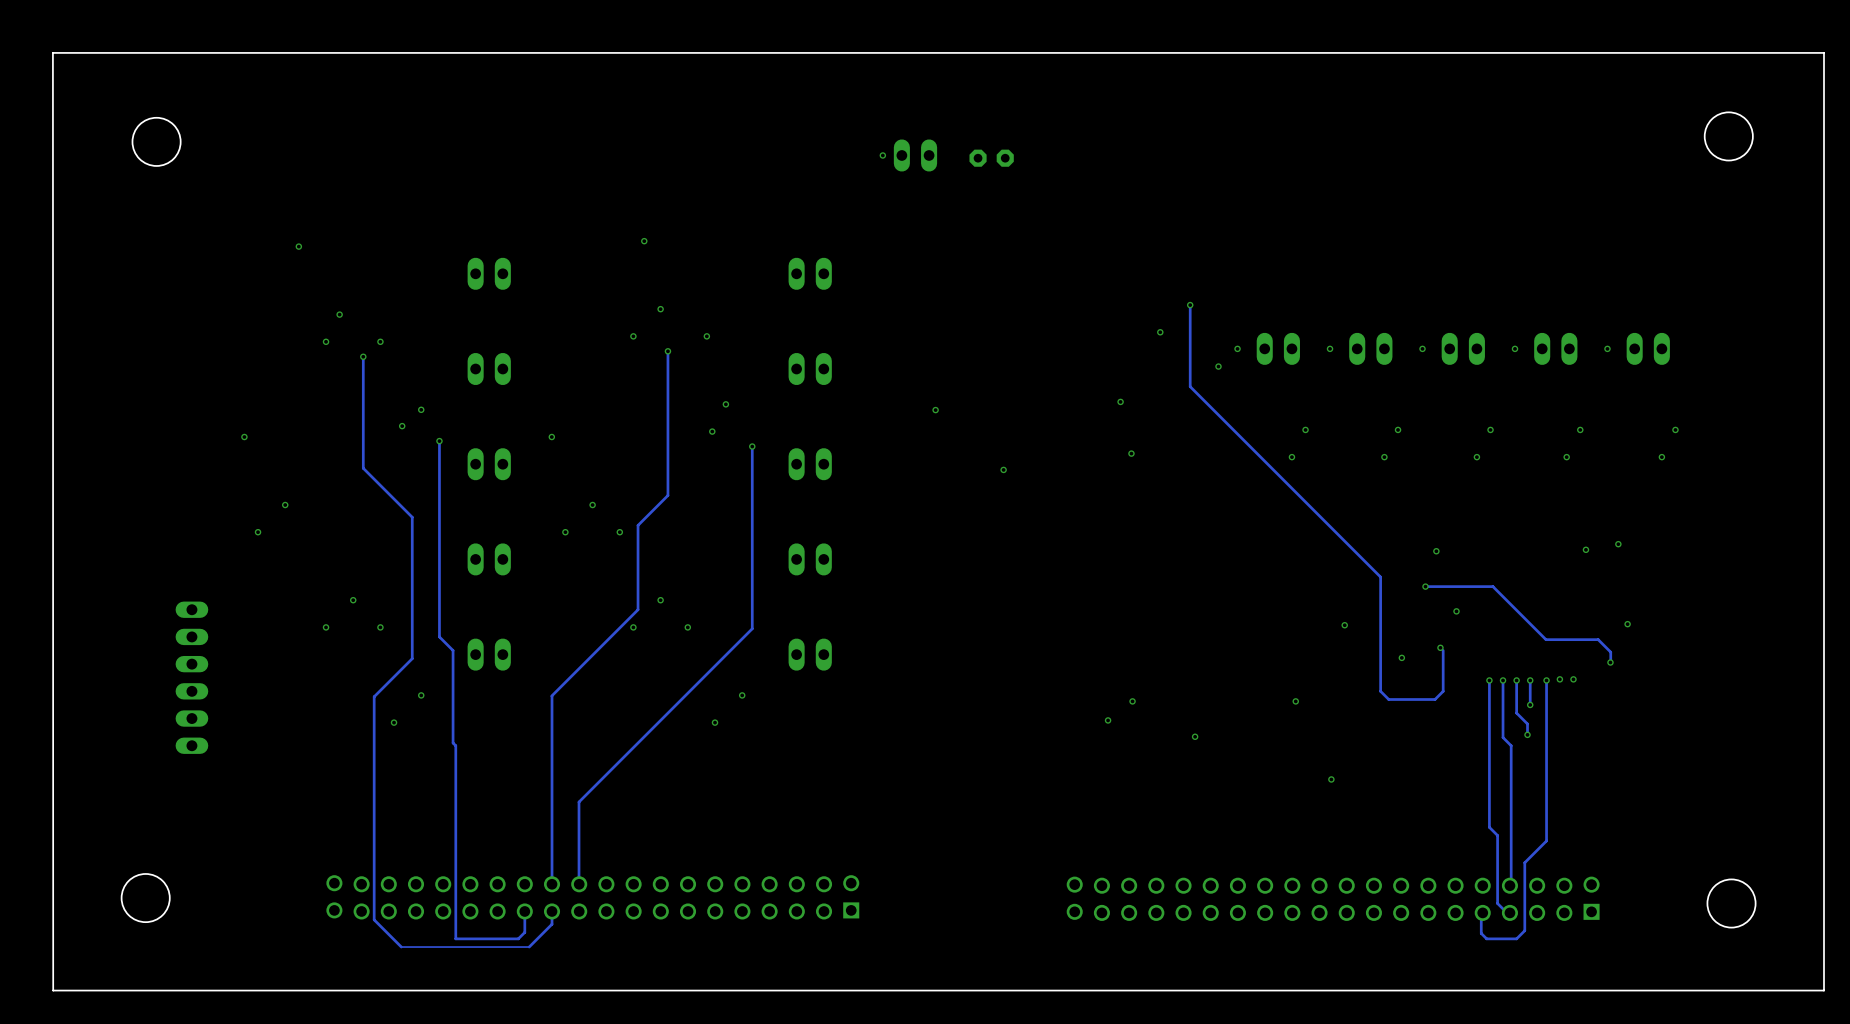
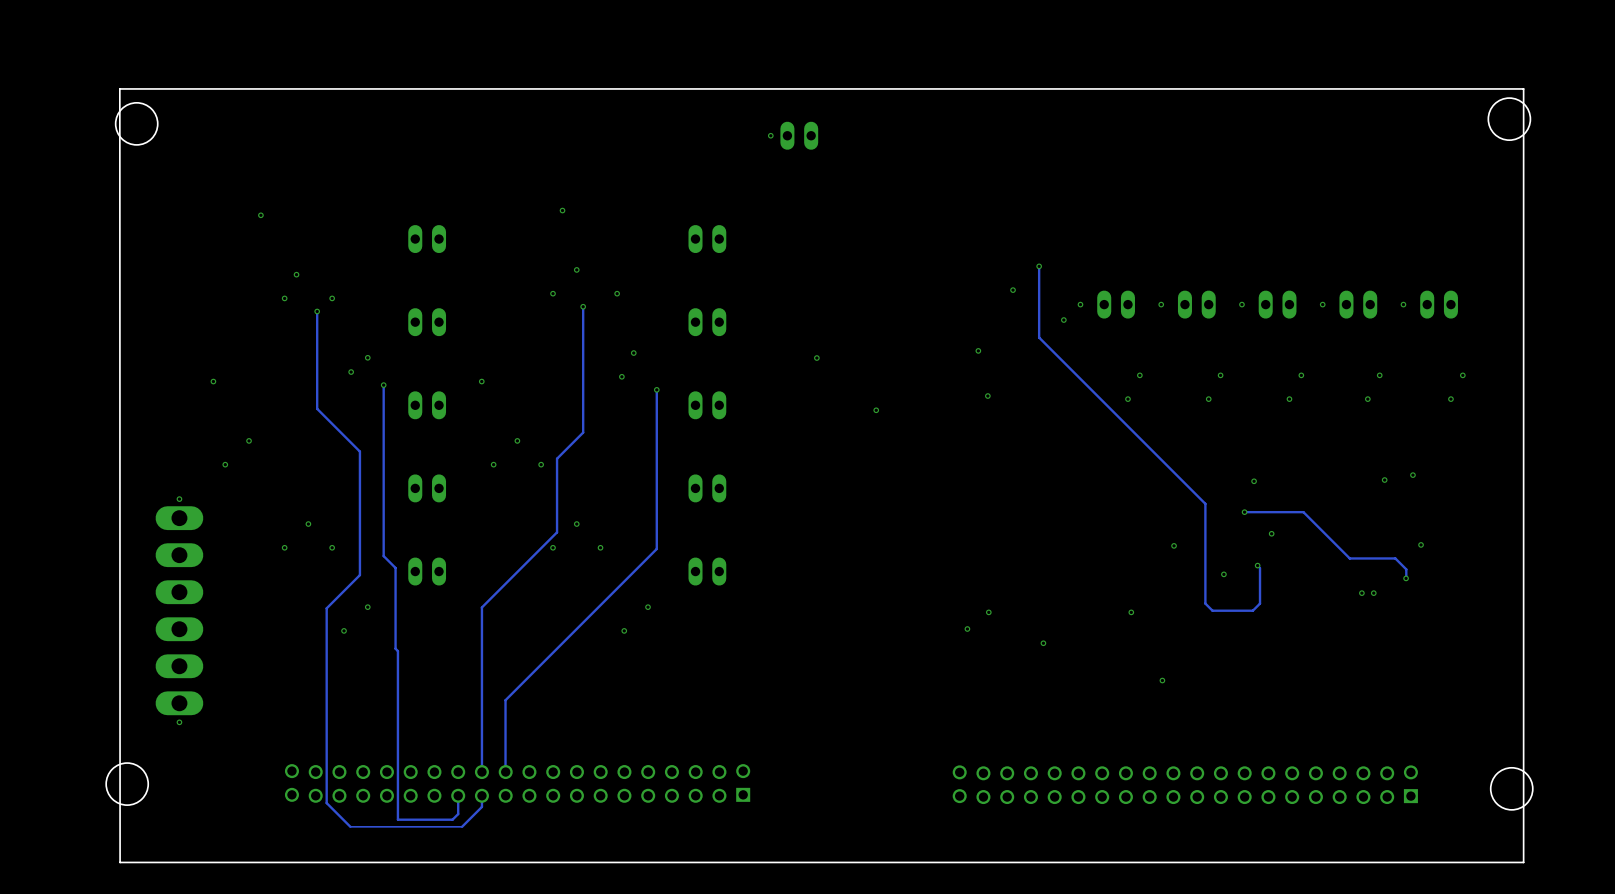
board edge: (1823, 52) (52, 52) (53, 990) (1823, 990) (1823, 52) -> (1523, 88) (1523, 862) (120, 862) (119, 88) (1523, 88)
part: (991, 158) -> none
via: none -> (179, 499)
part: (191, 677) -> none
track: (1489, 680) (1489, 827) (1497, 835) (1497, 903) (1506, 912) (1509, 912) -> none
via: (1489, 680) -> none
track: (1503, 680) (1503, 737) (1511, 745) (1509, 885) -> none
via: (1503, 680) -> none
track: (1516, 680) (1516, 713) (1527, 723) (1527, 734) -> none
via: (1516, 680) -> none
track: (1530, 680) (1530, 704) -> none
via: (1530, 680) -> none
track: (1546, 680) (1546, 840) (1524, 862) (1524, 930) (1516, 938) (1486, 938) (1481, 933) (1482, 912) -> none
via: (1546, 680) -> none
part: none -> (179, 610)
via: (1530, 704) -> none
via: (1527, 734) -> none
via: none -> (179, 722)
part position: (1333, 898) -> (1185, 784)

